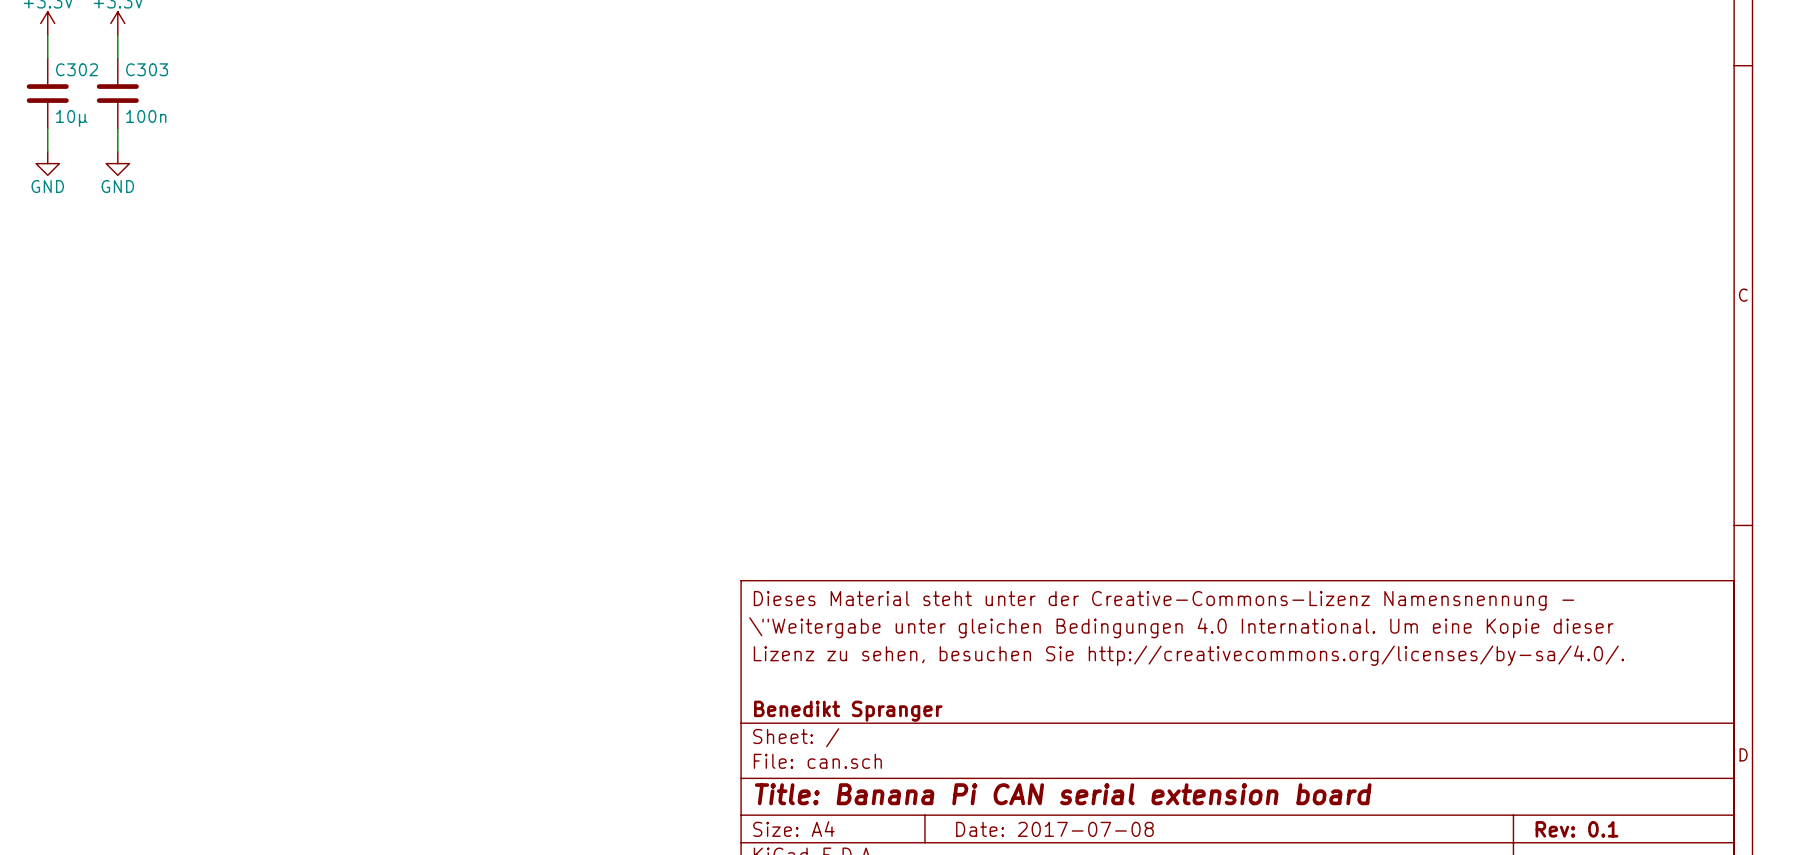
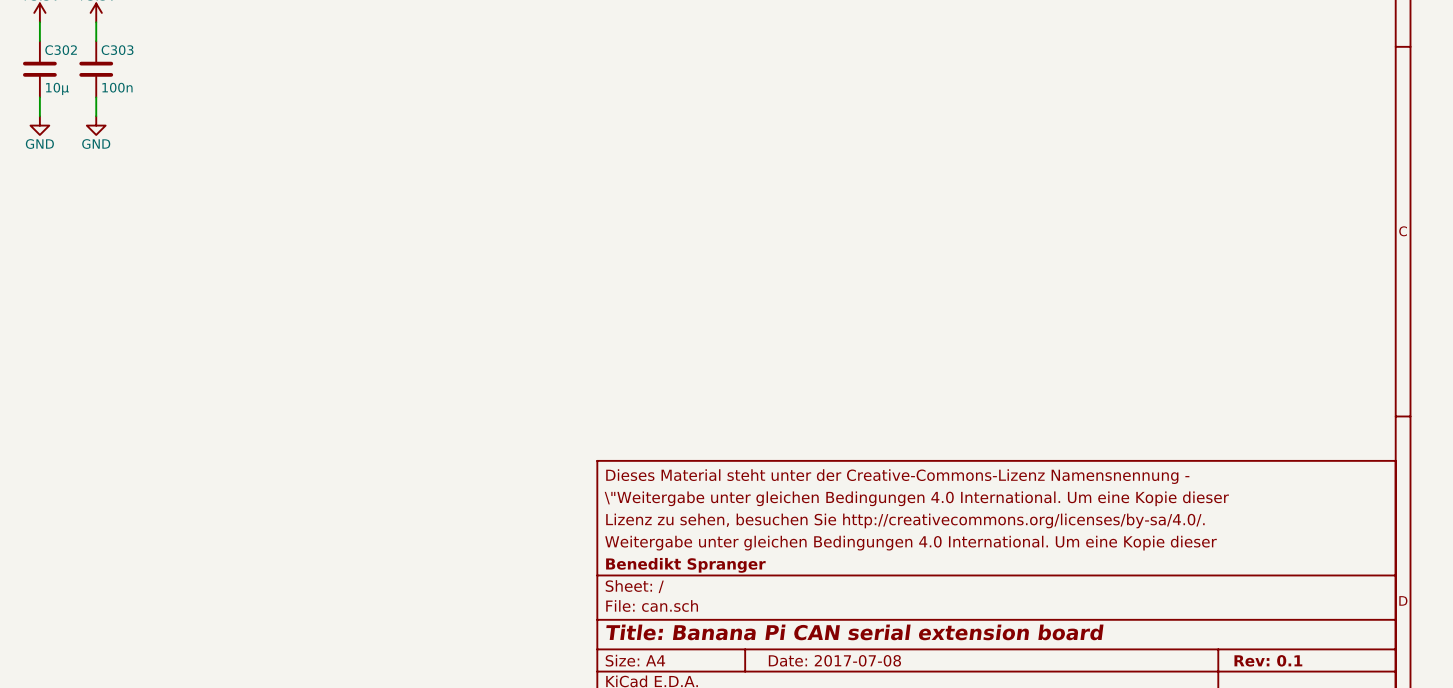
title block: none -> Weitergabe unter gleichen Bedingungen 4.0 International. Um eine Kopie dieser (911, 543)

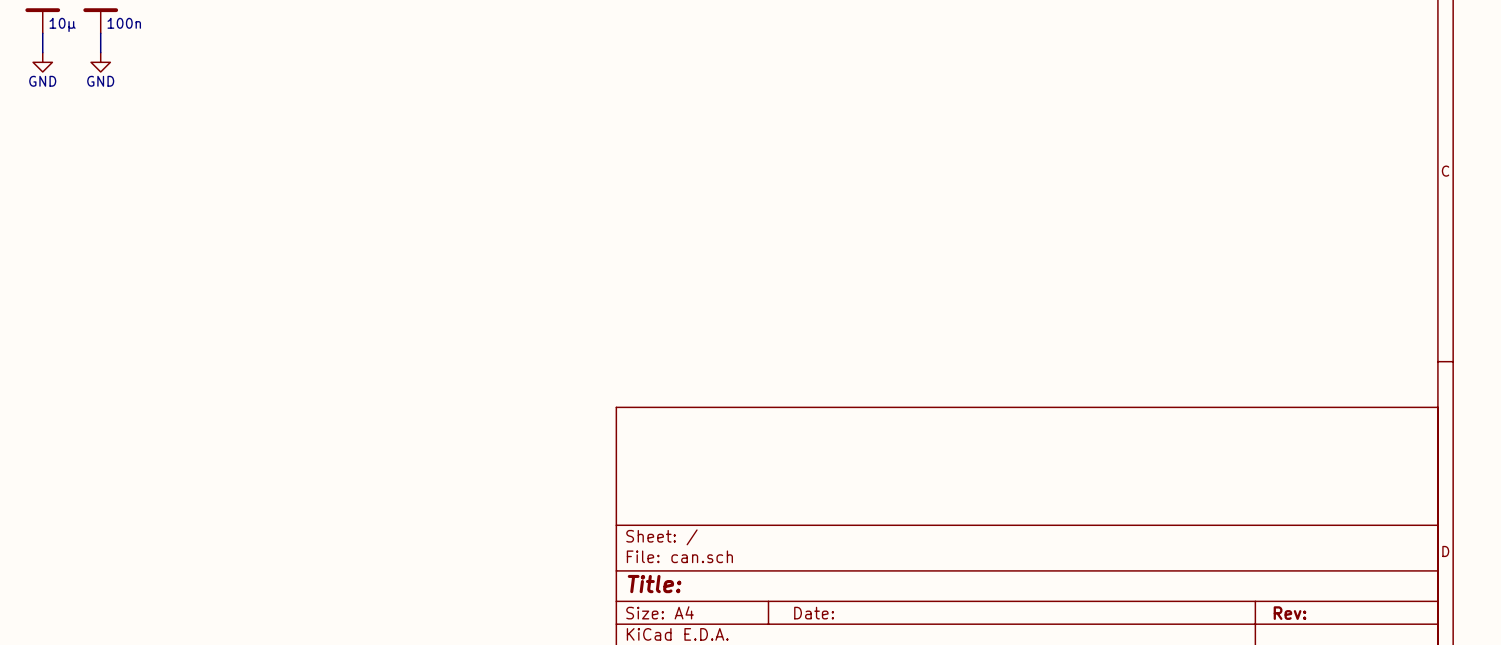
title block: Dieses Material steht unter der Creative-Commons-Lizenz Namensnennung - (897, 476) -> none
title block: \"Weitergabe unter gleichen Bedingungen 4.0 International. Um eine Kopie dieser (916, 498) -> none
title block: Lizenz zu sehen, besuchen Sie http://creativecommons.org/licenses/by-sa/4.0/. (905, 520) -> none
title block: Weitergabe unter gleichen Bedingungen 4.0 International. Um eine Kopie dieser (911, 543) -> none
title block: Benedikt Spranger (685, 565) -> none
title block: Title: Banana Pi CAN serial extension board (854, 632) -> Title: (654, 584)
title block: Date: 2017-07-08 (834, 660) -> Date: (814, 613)
title block: Rev: 0.1 (1268, 660) -> Rev: (1290, 613)

